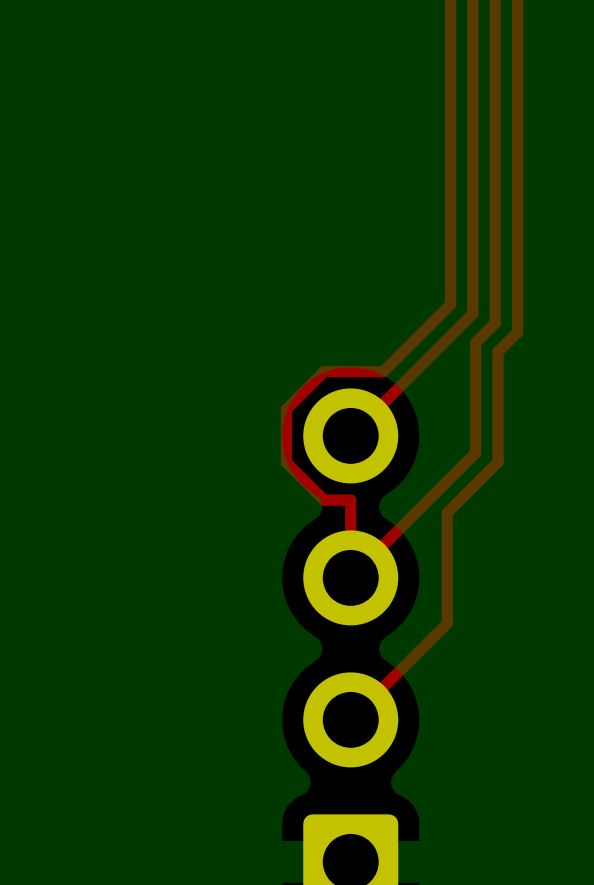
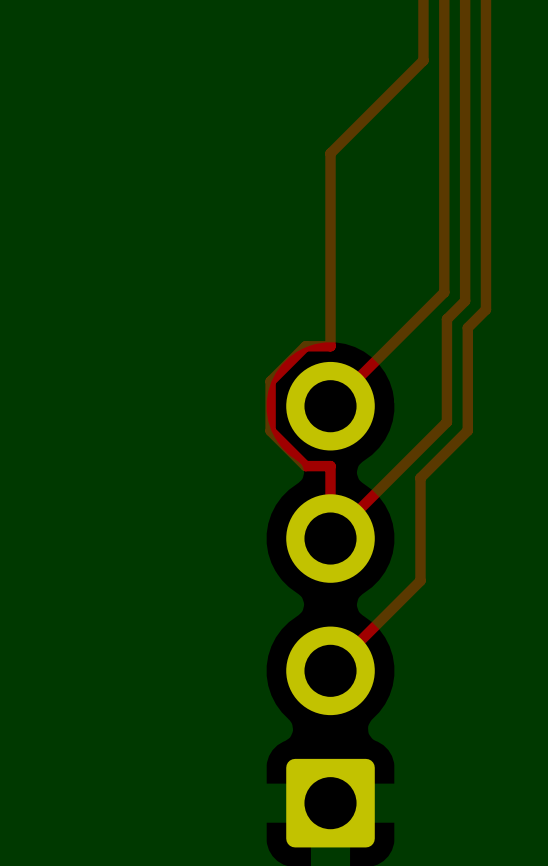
top track: (450, 64) (450, 304) (383, 371) (350, 371) -> (423, 60) (330, 153) (330, 346)

